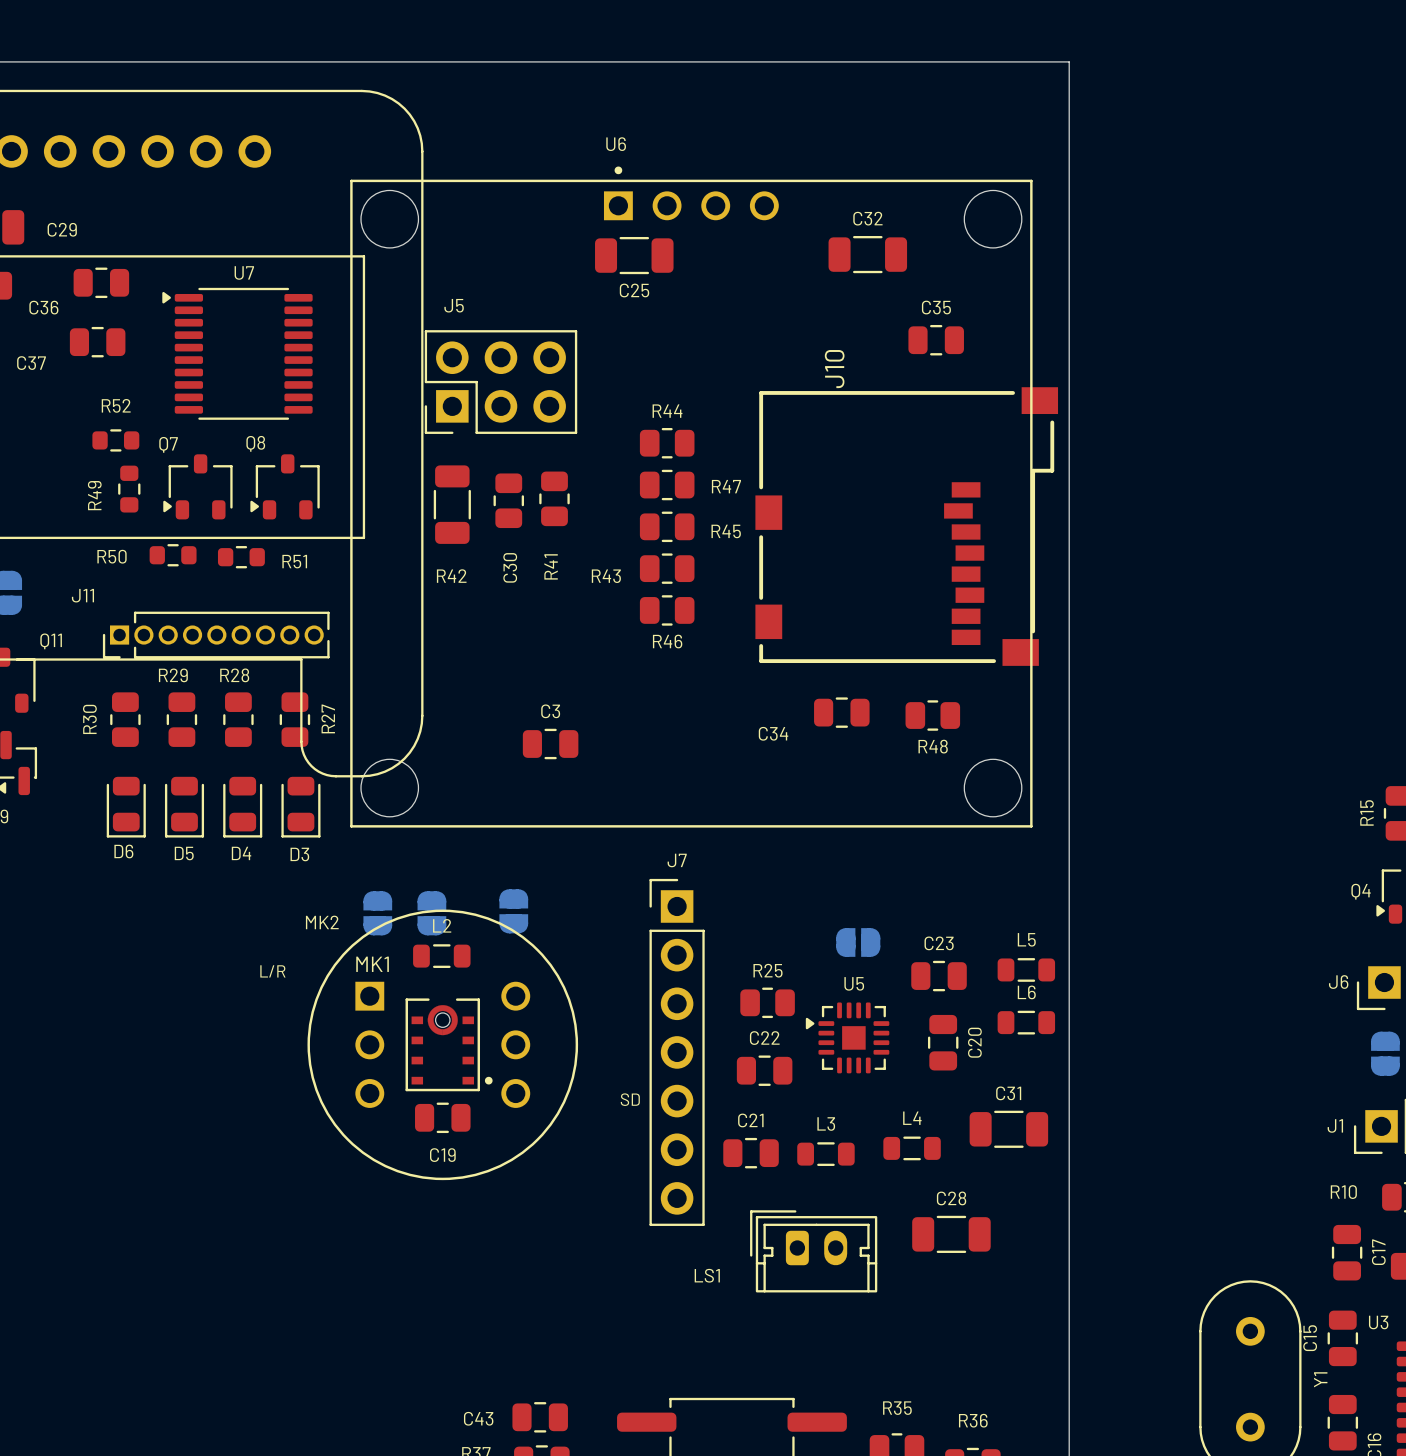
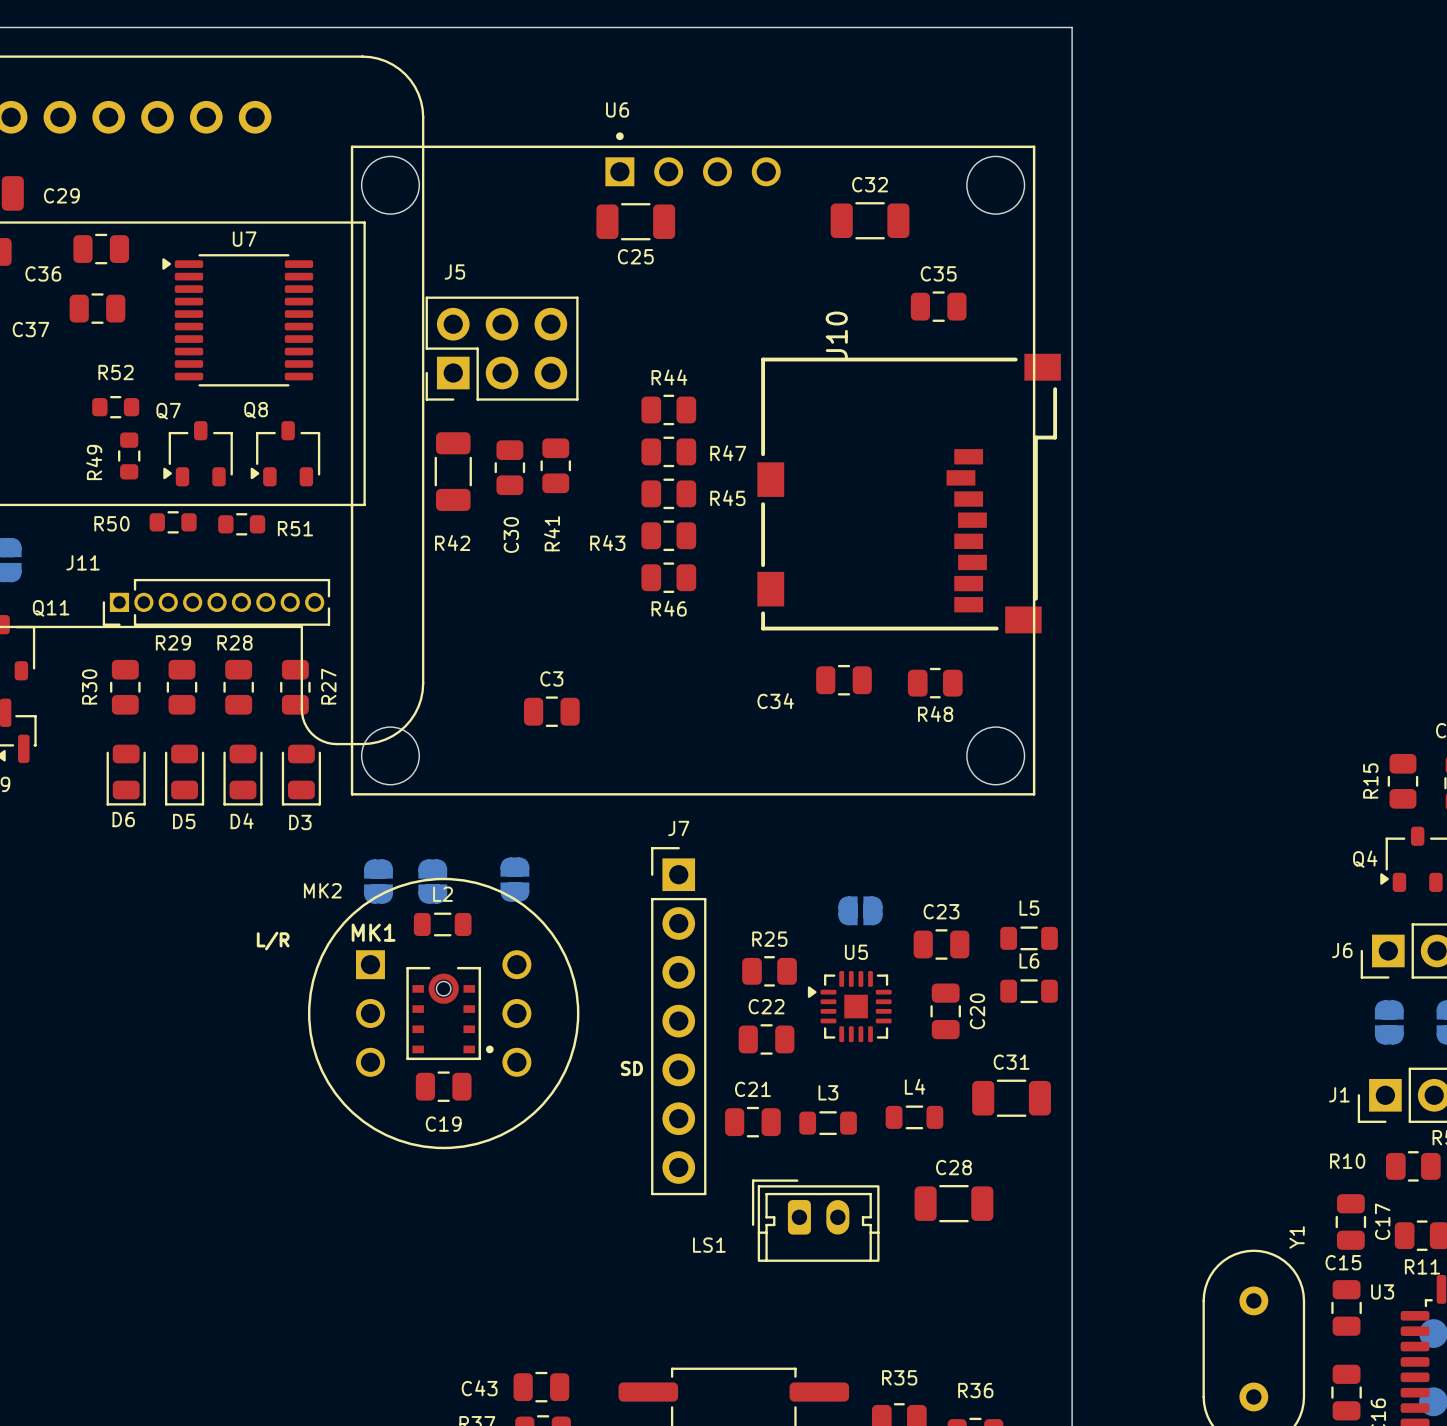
C15 name rotation: 0° (1310, 1338) -> 90° clockwise (1343, 1262)
C15 name position: C15 (1310, 1338) -> C15 (1343, 1262)
Y1 name position: Y1 (1320, 1379) -> Y1 (1297, 1237)

